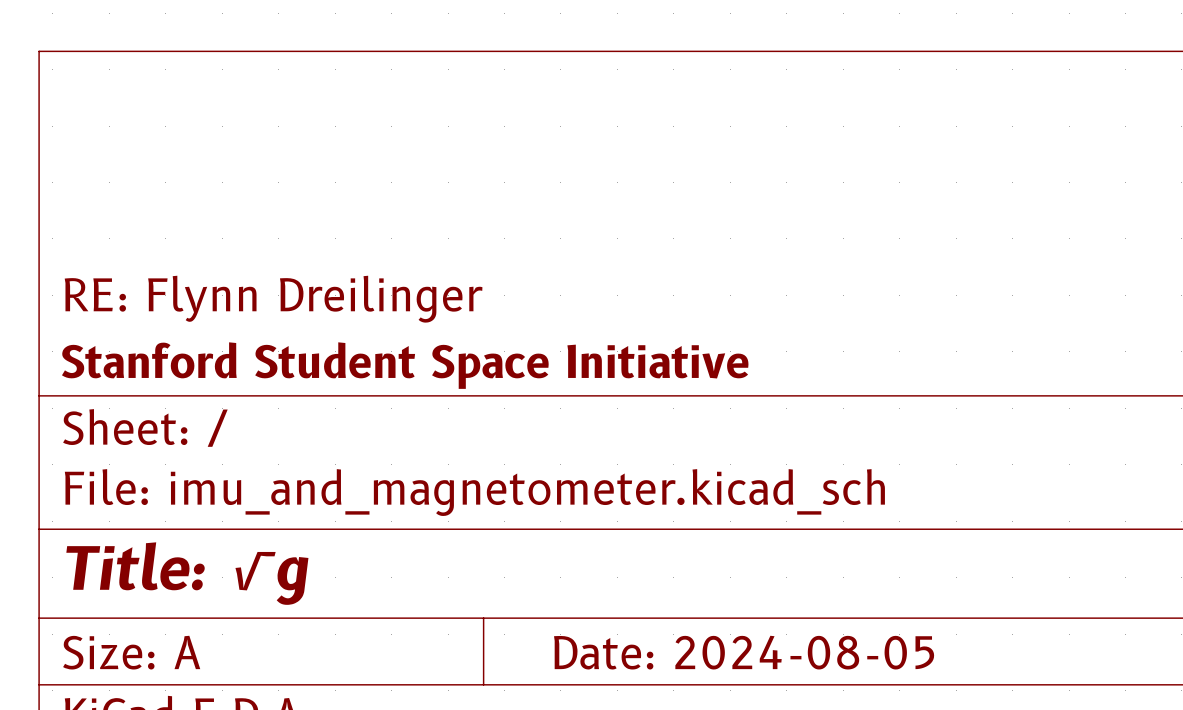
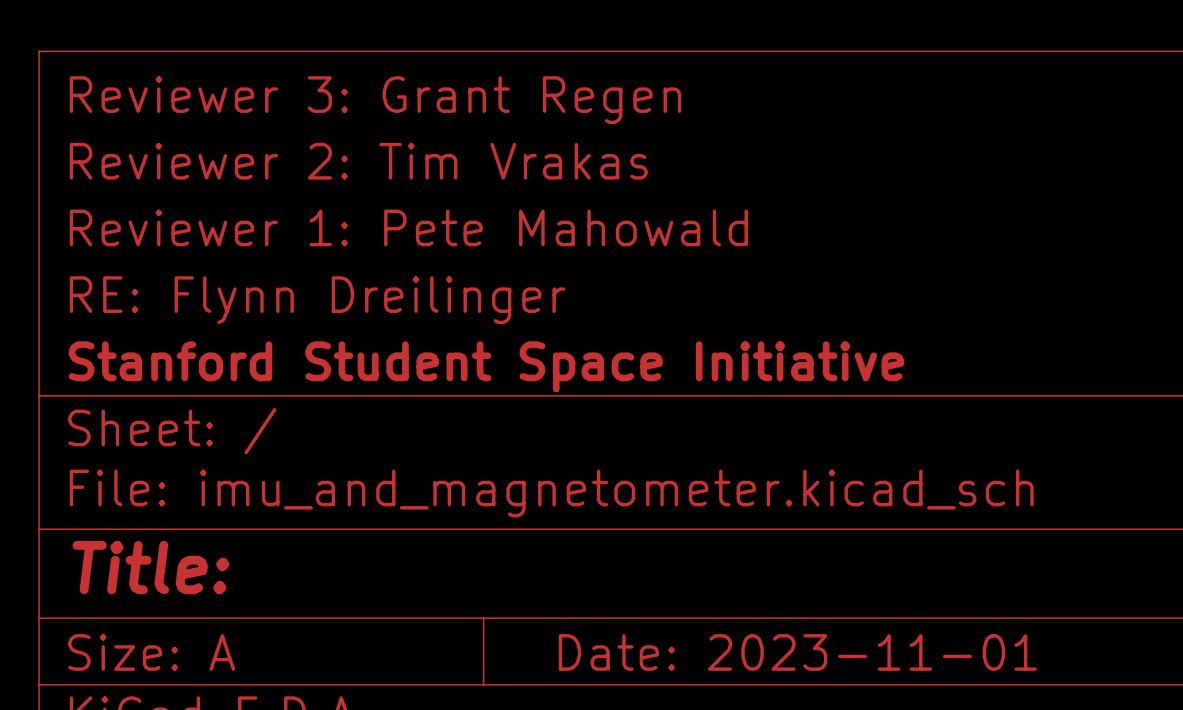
title block: none -> Reviewer 3: Grant Regen (375, 100)
title block: none -> Reviewer 2: Tim Vrakas (358, 161)
title block: none -> Reviewer 1: Pete Mahowald (408, 227)
title block: Title: √g (187, 573) -> Title: (150, 567)
title block: Date: 2024-08-05 (744, 652) -> Date: 2023-11-01 (797, 652)

